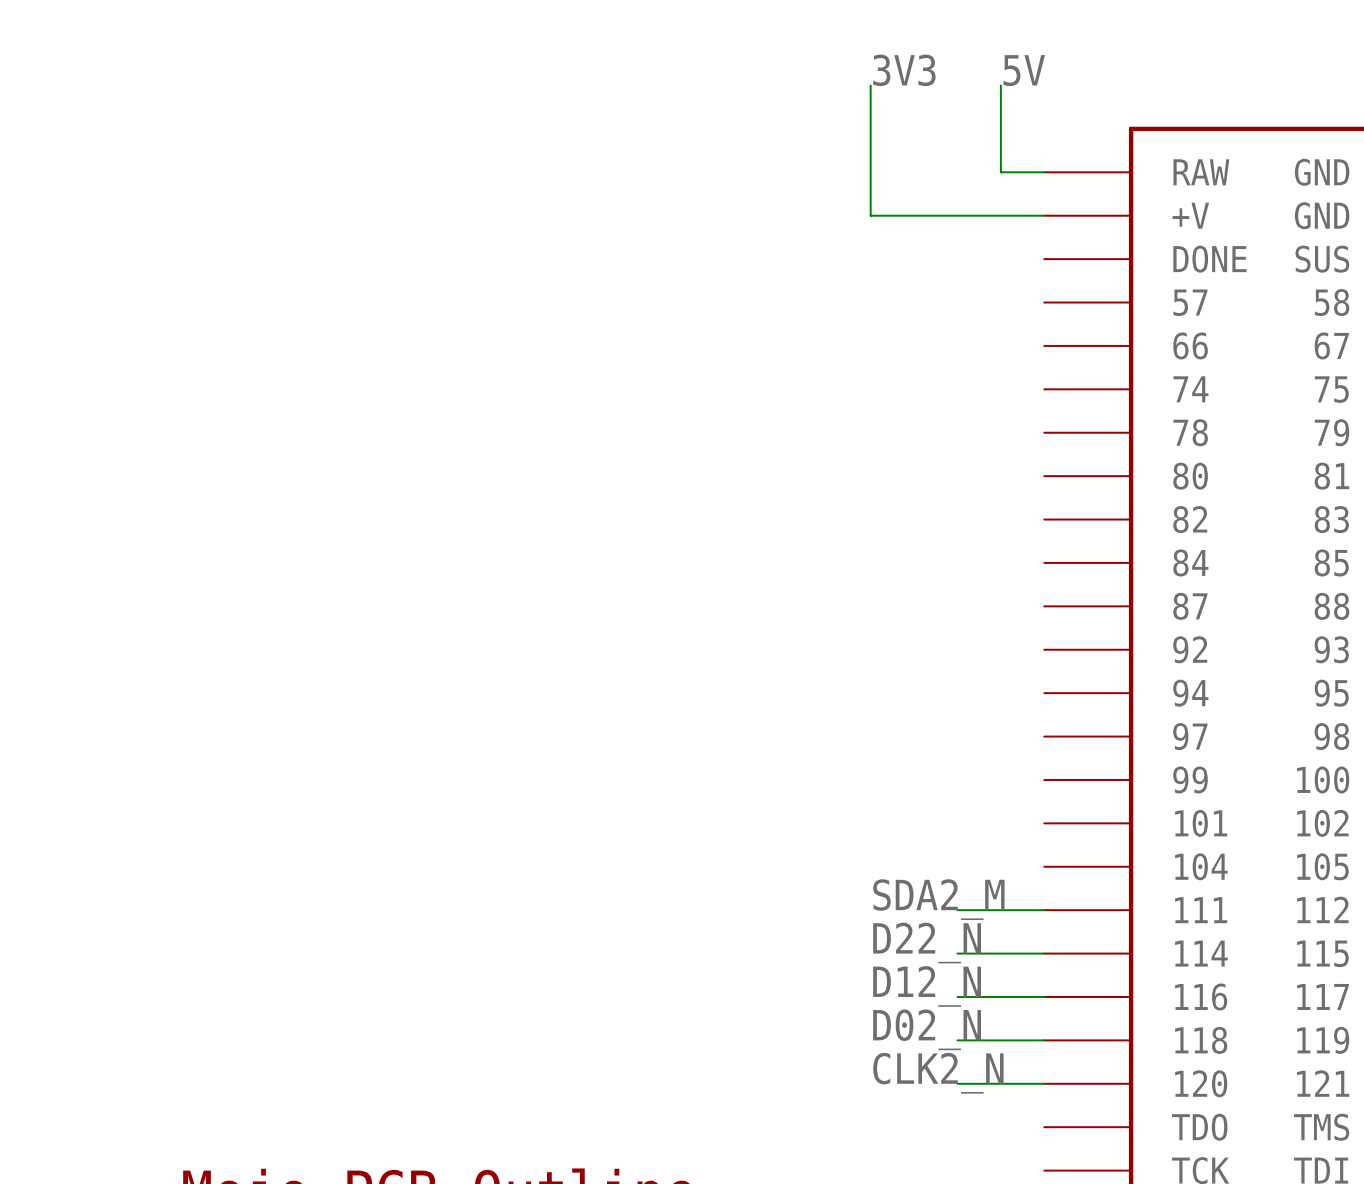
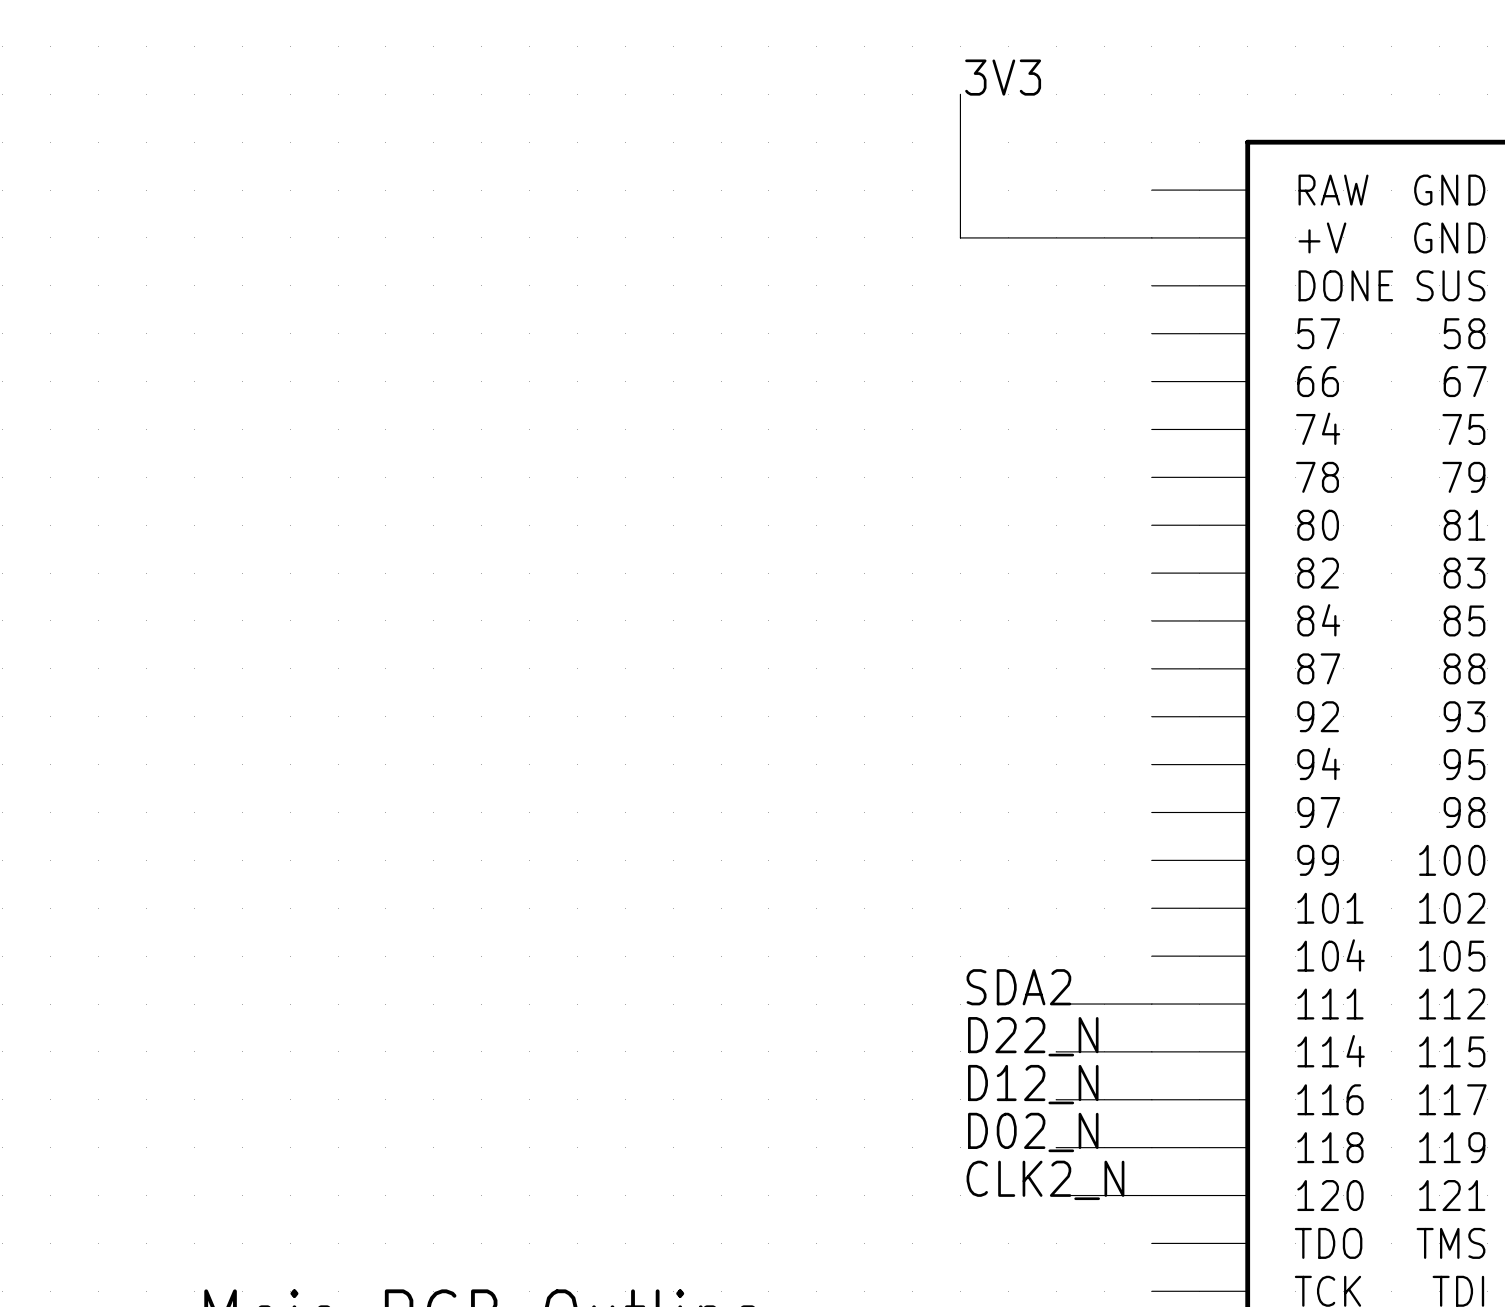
label: 5V (1024, 70) -> none
wire: (1000, 85) (1000, 172) (1044, 172) -> none
label: SDA2_M (938, 899) -> SDA2 (1018, 987)

